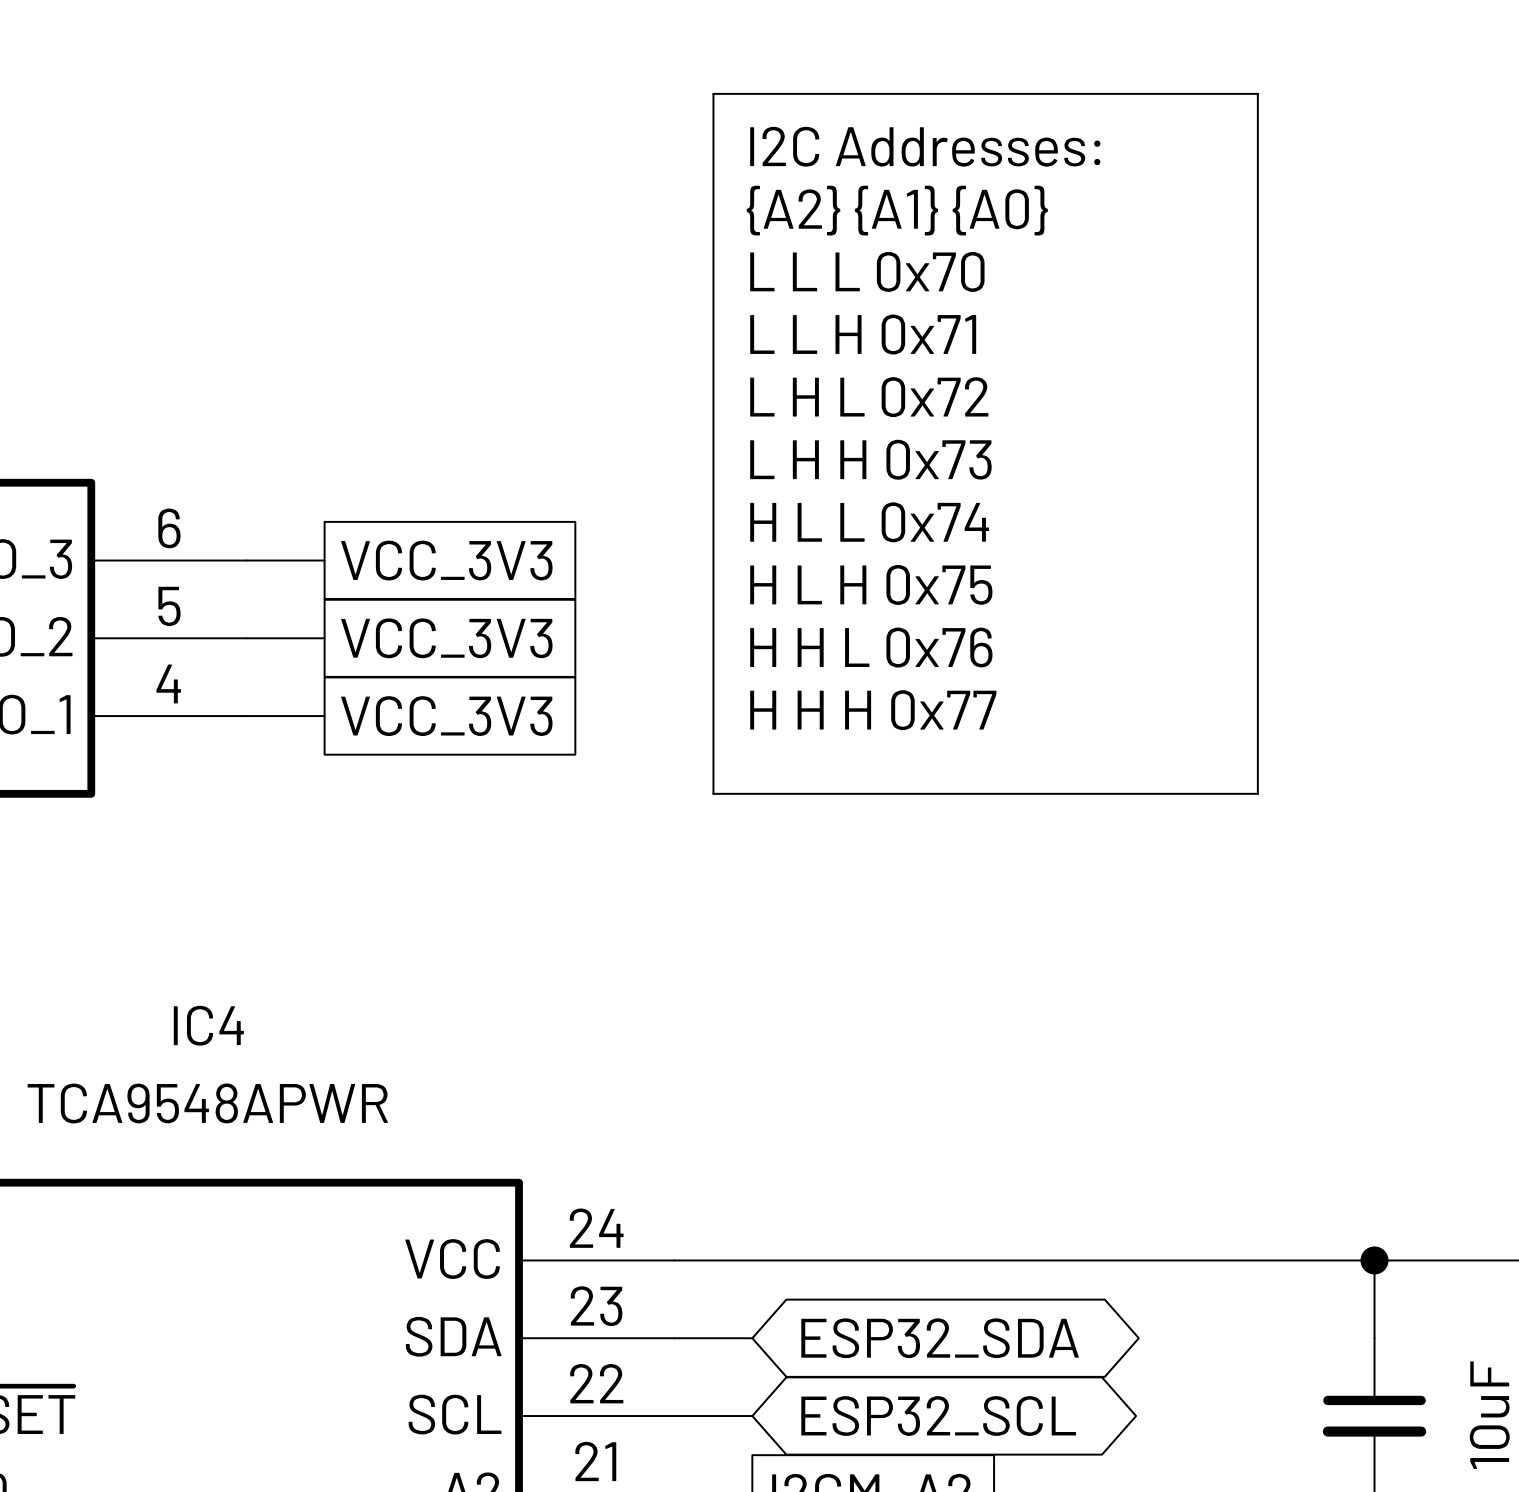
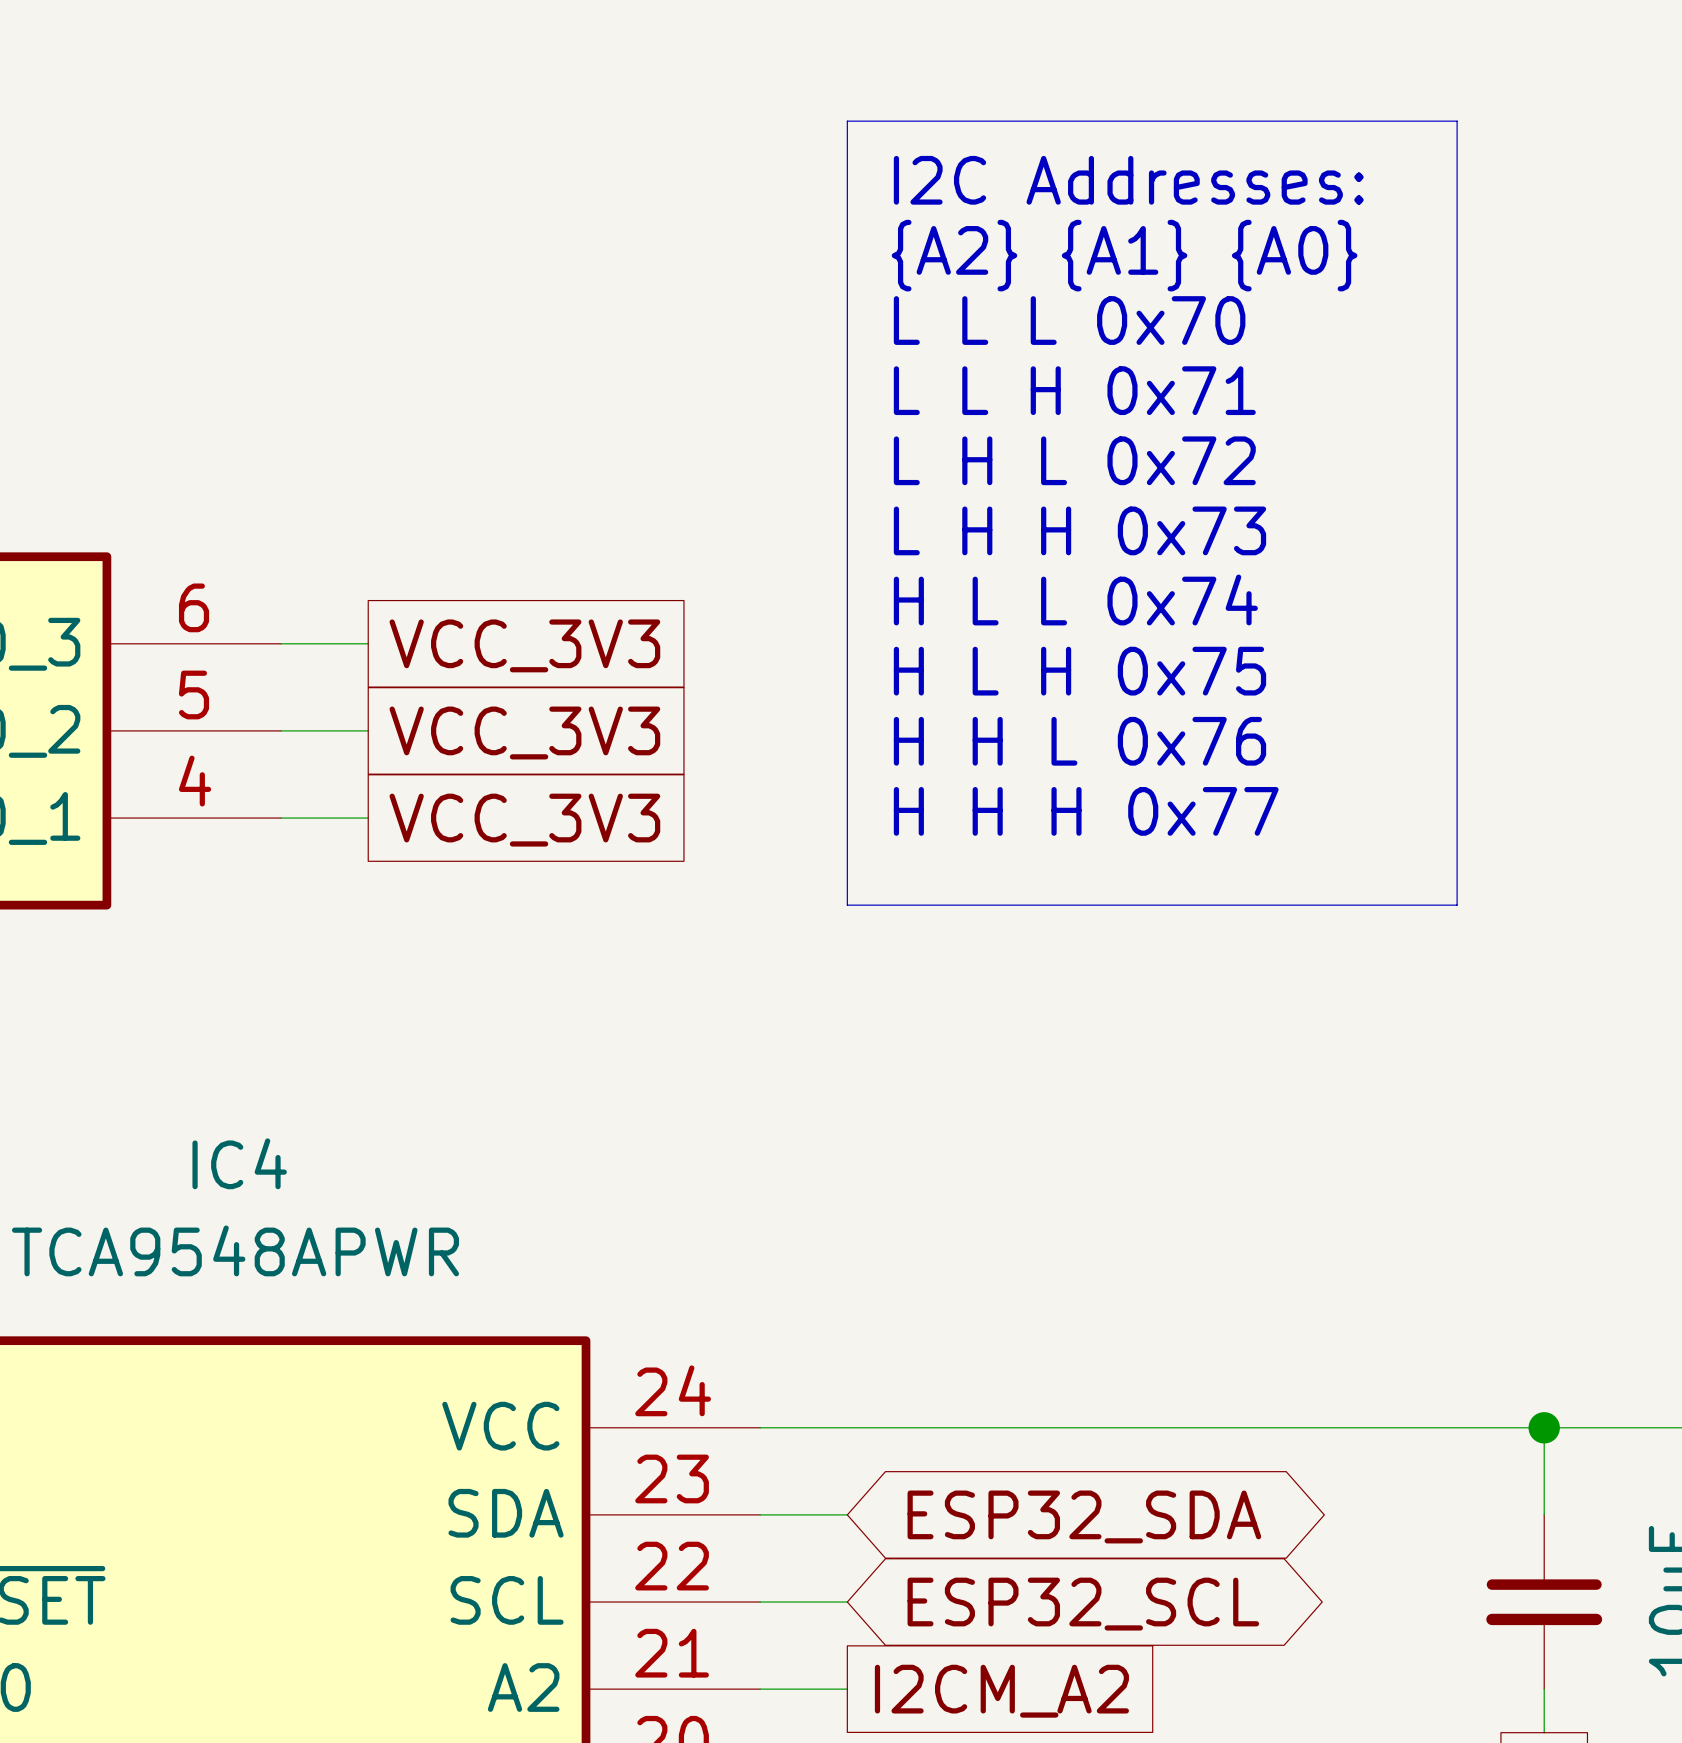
line: (752, 93) (713, 93) (713, 793) (752, 793) -> (847, 121) (847, 905)
line: (1257, 93) (1257, 793) -> (1413, 121) (1457, 121) (1457, 905) (1413, 905)
text position: I2C Addresses: (925, 146) -> I2C Addresses: (1128, 180)
text position: {A2} {A1} {A0} (897, 210) -> {A2} {A1} {A0} (1124, 255)
text position: L L L 0x70 (867, 271) -> L L L 0x70 (1069, 320)
text position: L L H 0x71 (863, 334) -> L L H 0x71 (1074, 390)
text position: L H L 0x72 (869, 397) -> L H L 0x72 (1074, 460)
text position: L H H 0x73 (870, 459) -> L H H 0x73 (1079, 530)
text position: H L L 0x74 (869, 522) -> H L L 0x74 (1075, 599)
text position: H L H 0x75 (871, 584) -> H L H 0x75 (1079, 671)
text position: H H L 0x76 (871, 647) -> H H L 0x76 (1079, 741)
text position: H H H 0x77 (873, 710) -> H H H 0x77 (1086, 811)

